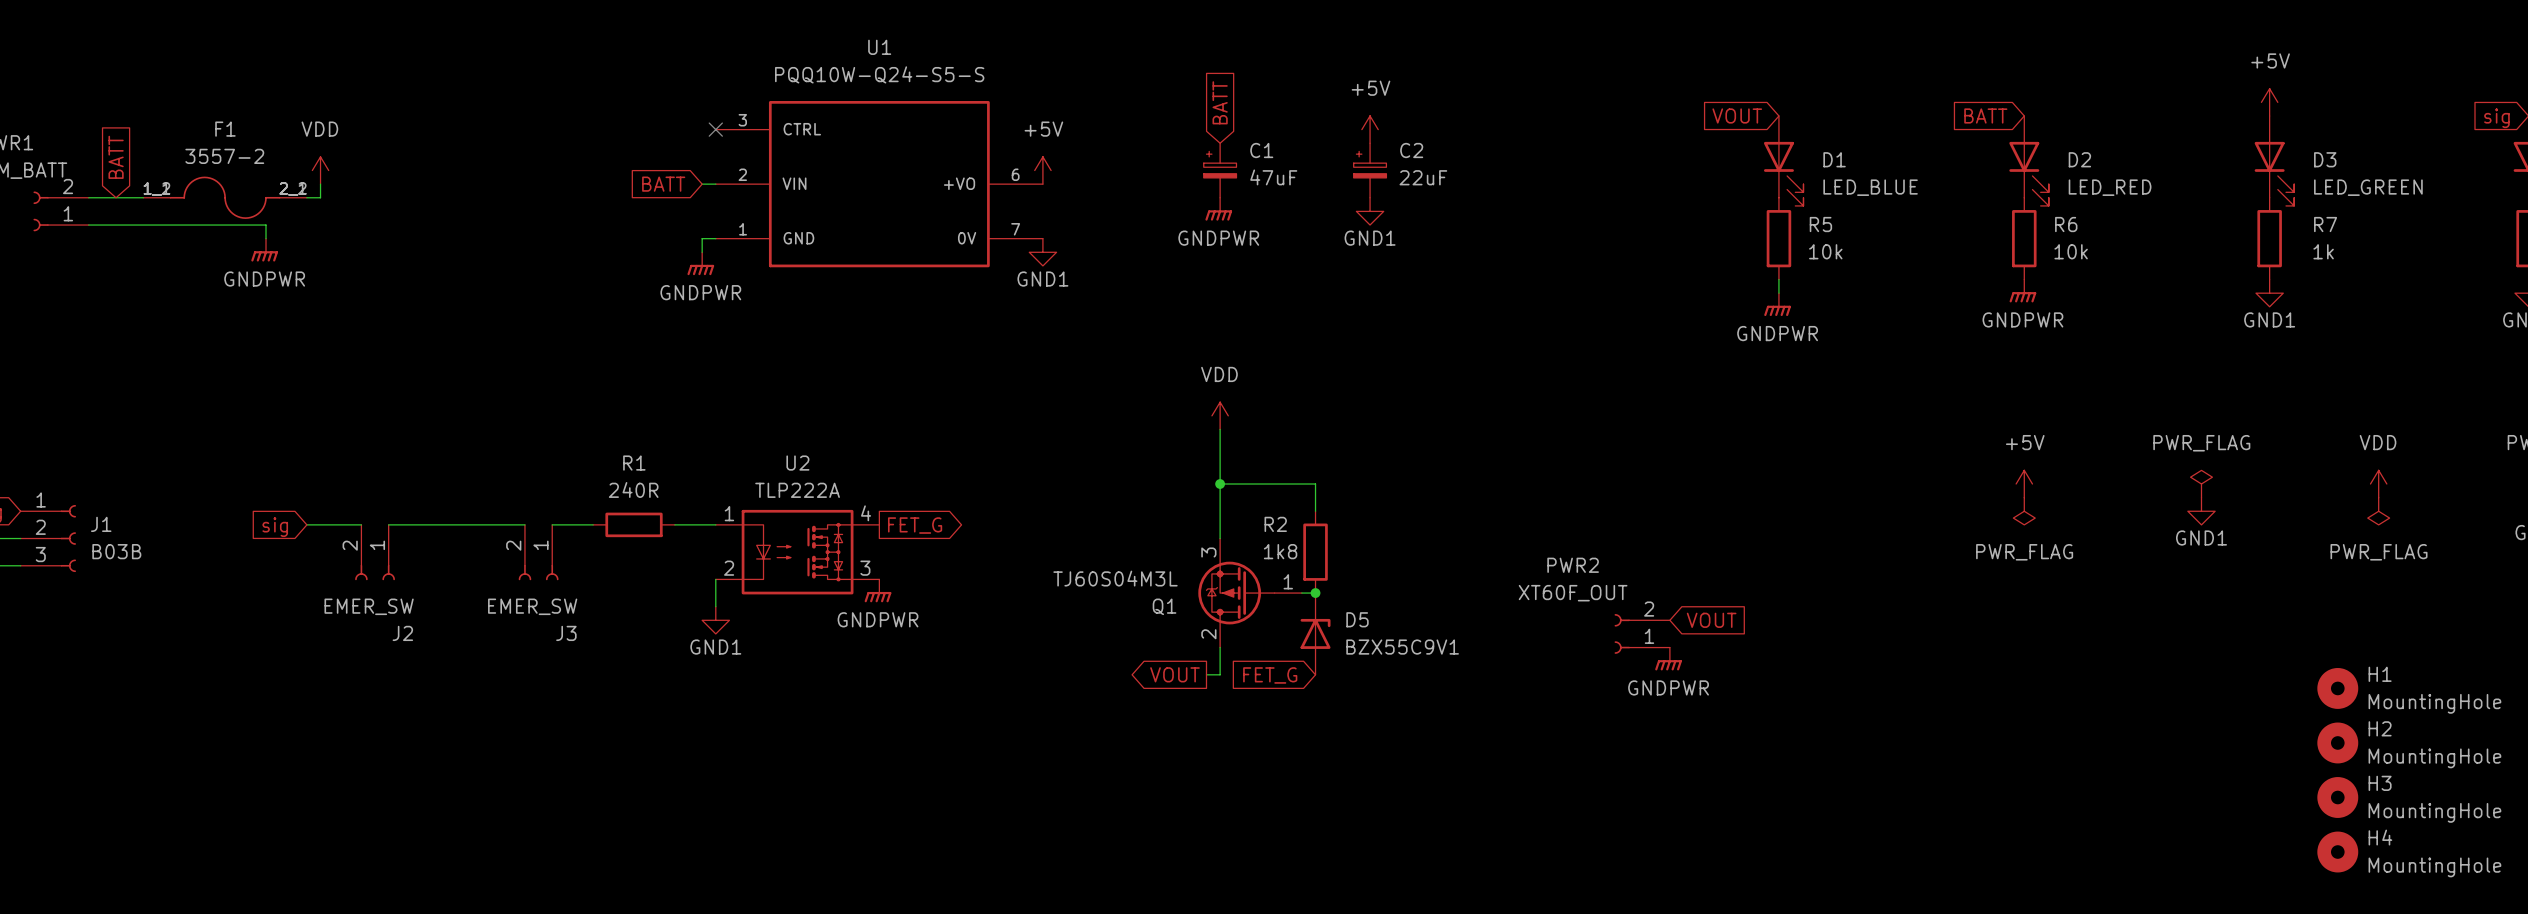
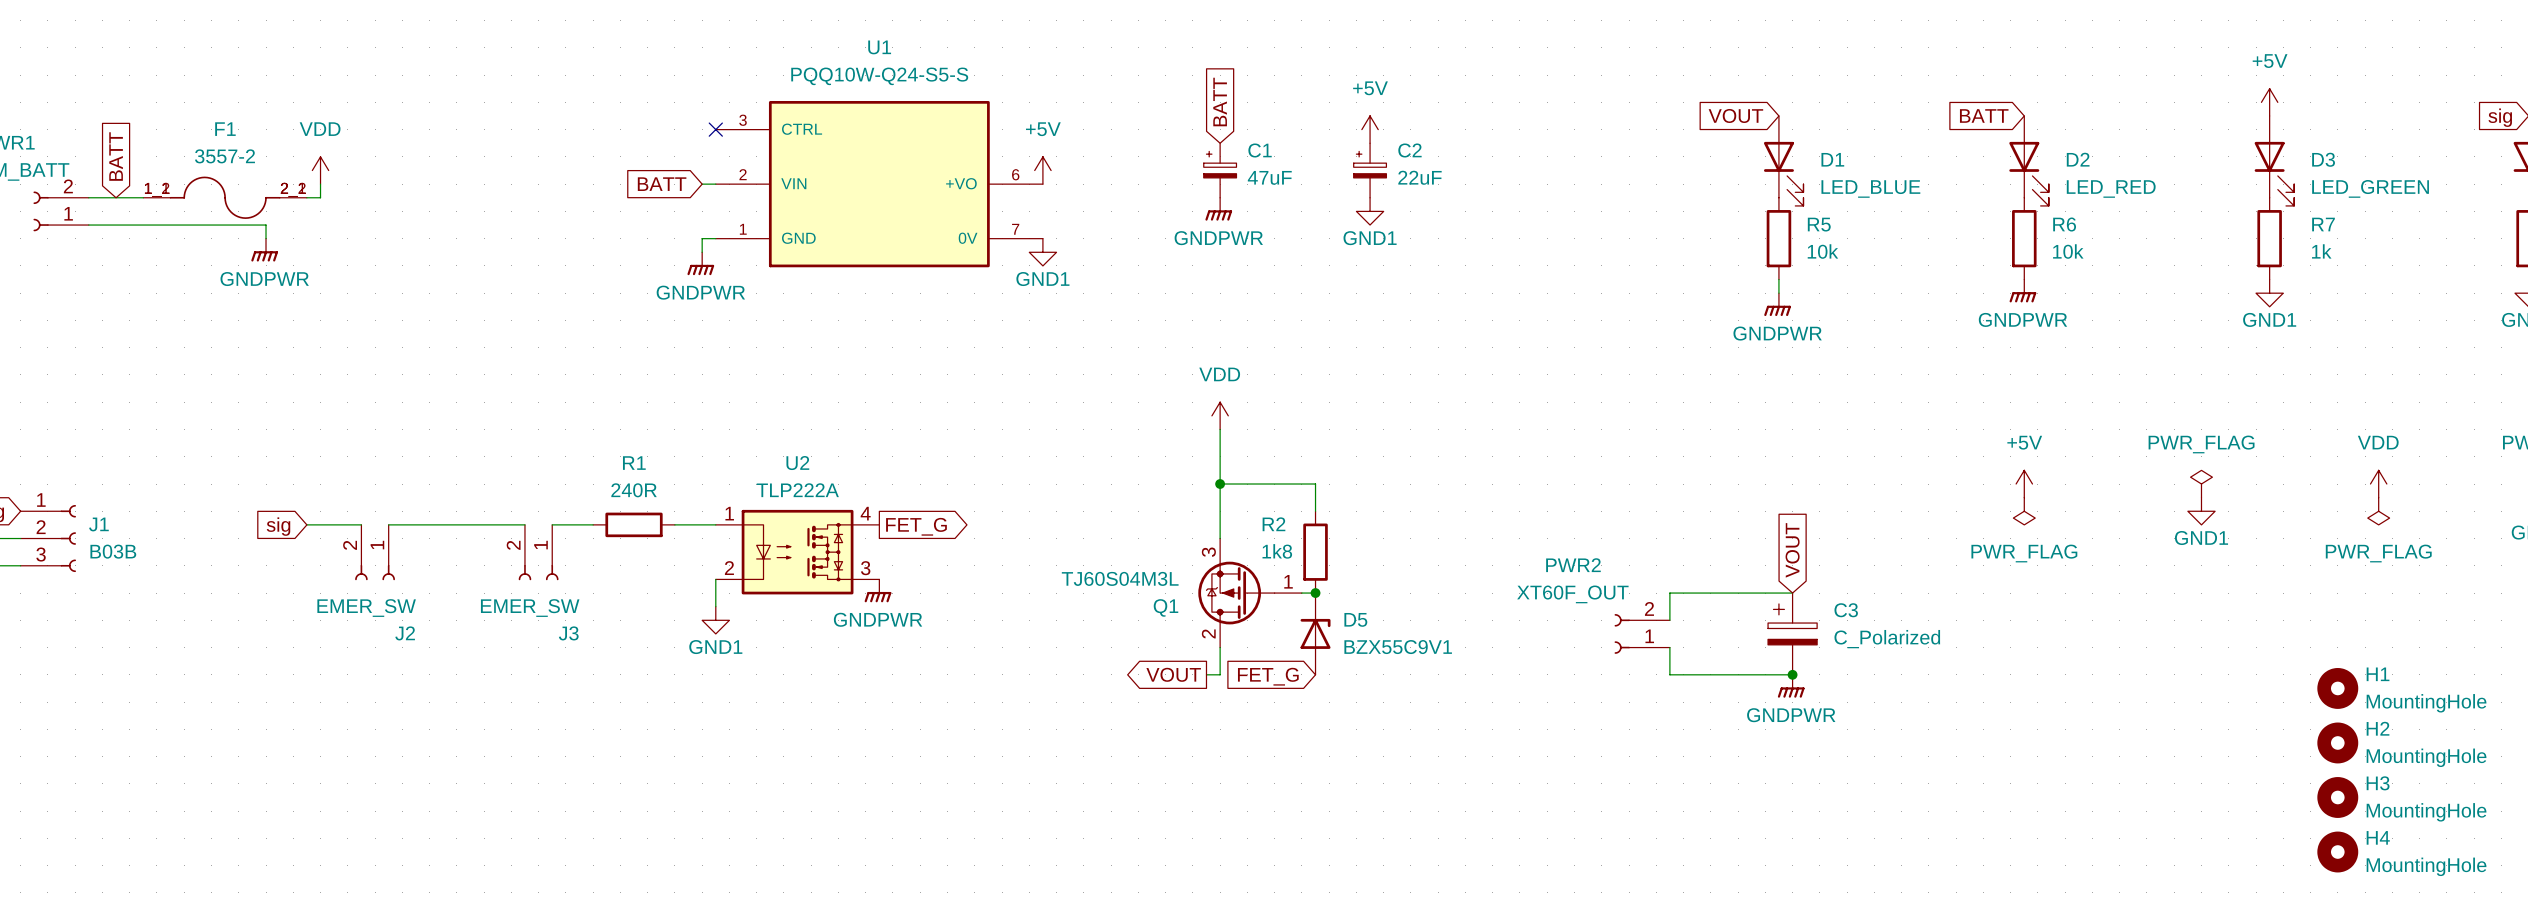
wire: none -> (1792, 593) (1669, 593) (1669, 620)
global label rotation: 0° (1711, 620) -> 90° counterclockwise (1792, 550)
global label position: VOUT (1711, 620) -> VOUT (1792, 550)
C3: none -> C_Polarized (1792, 633)
wire: none -> (1669, 647) (1669, 674) (1792, 674)
power symbol position: GNDPWR (1668, 659) -> GNDPWR (1791, 686)
junction: none -> (1792, 674)

